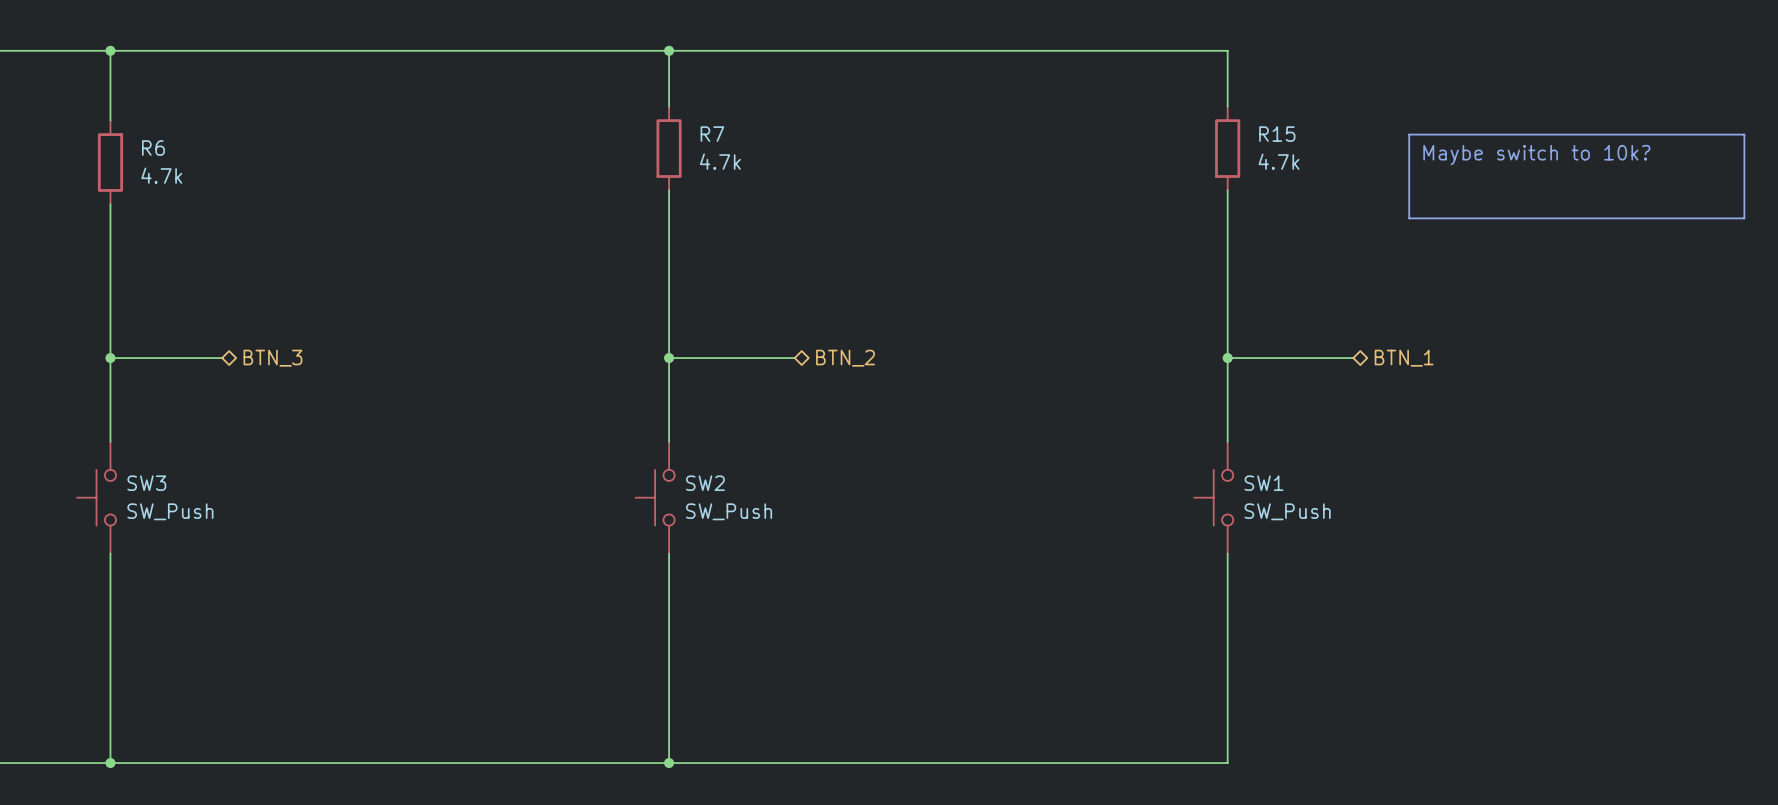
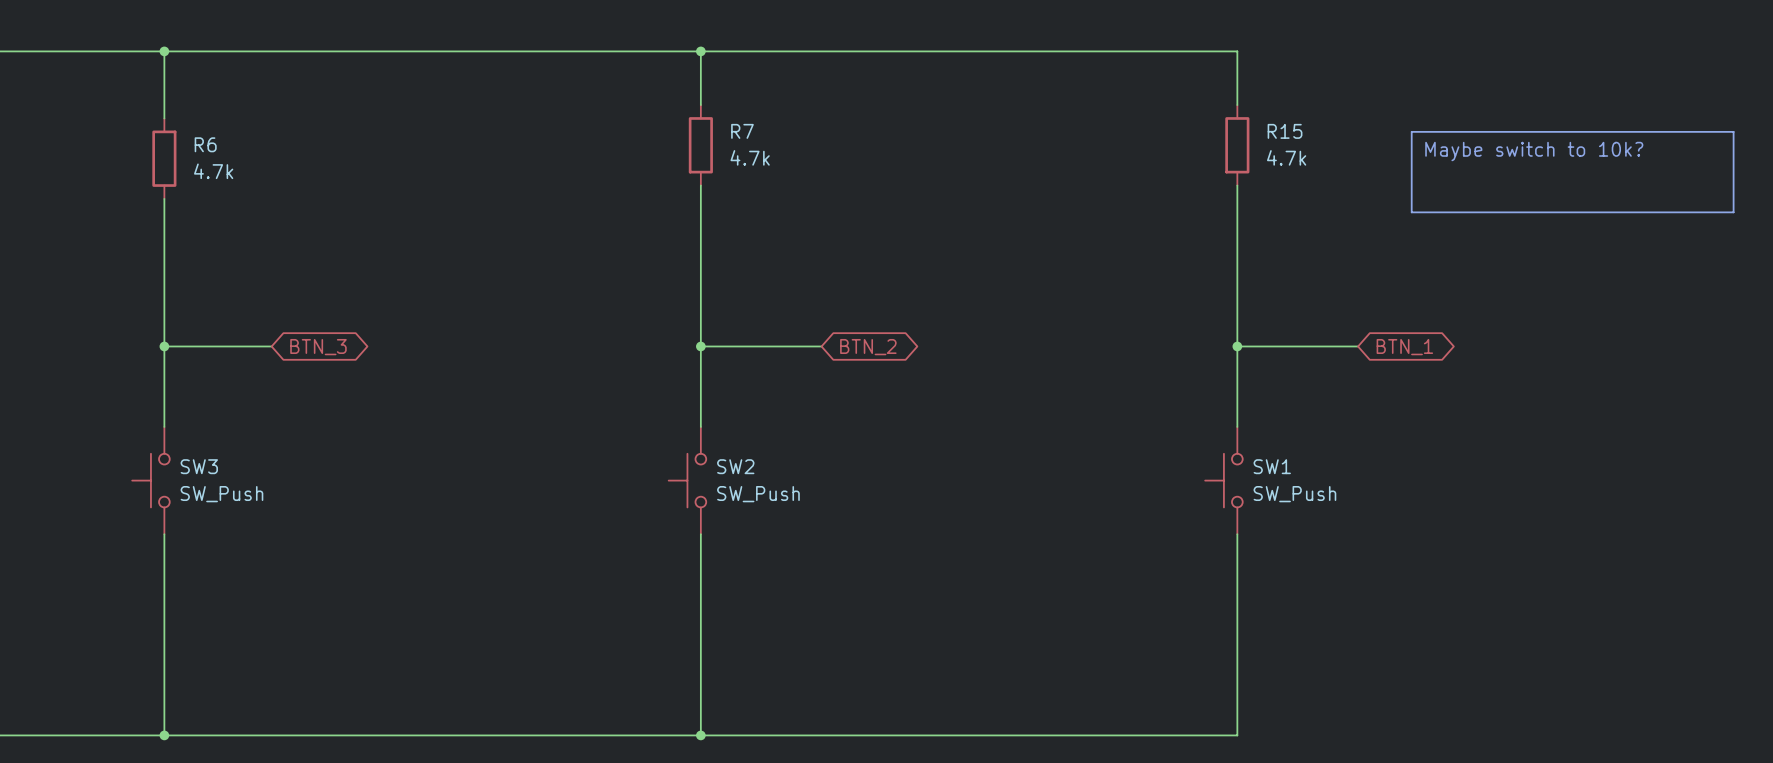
global label: none -> BTN_3 (318, 347)
hierarchical label: BTN_3 (272, 358) -> none
global label: none -> BTN_2 (868, 347)
hierarchical label: BTN_2 (845, 358) -> none
global label: none -> BTN_1 (1404, 347)
hierarchical label: BTN_1 (1404, 358) -> none

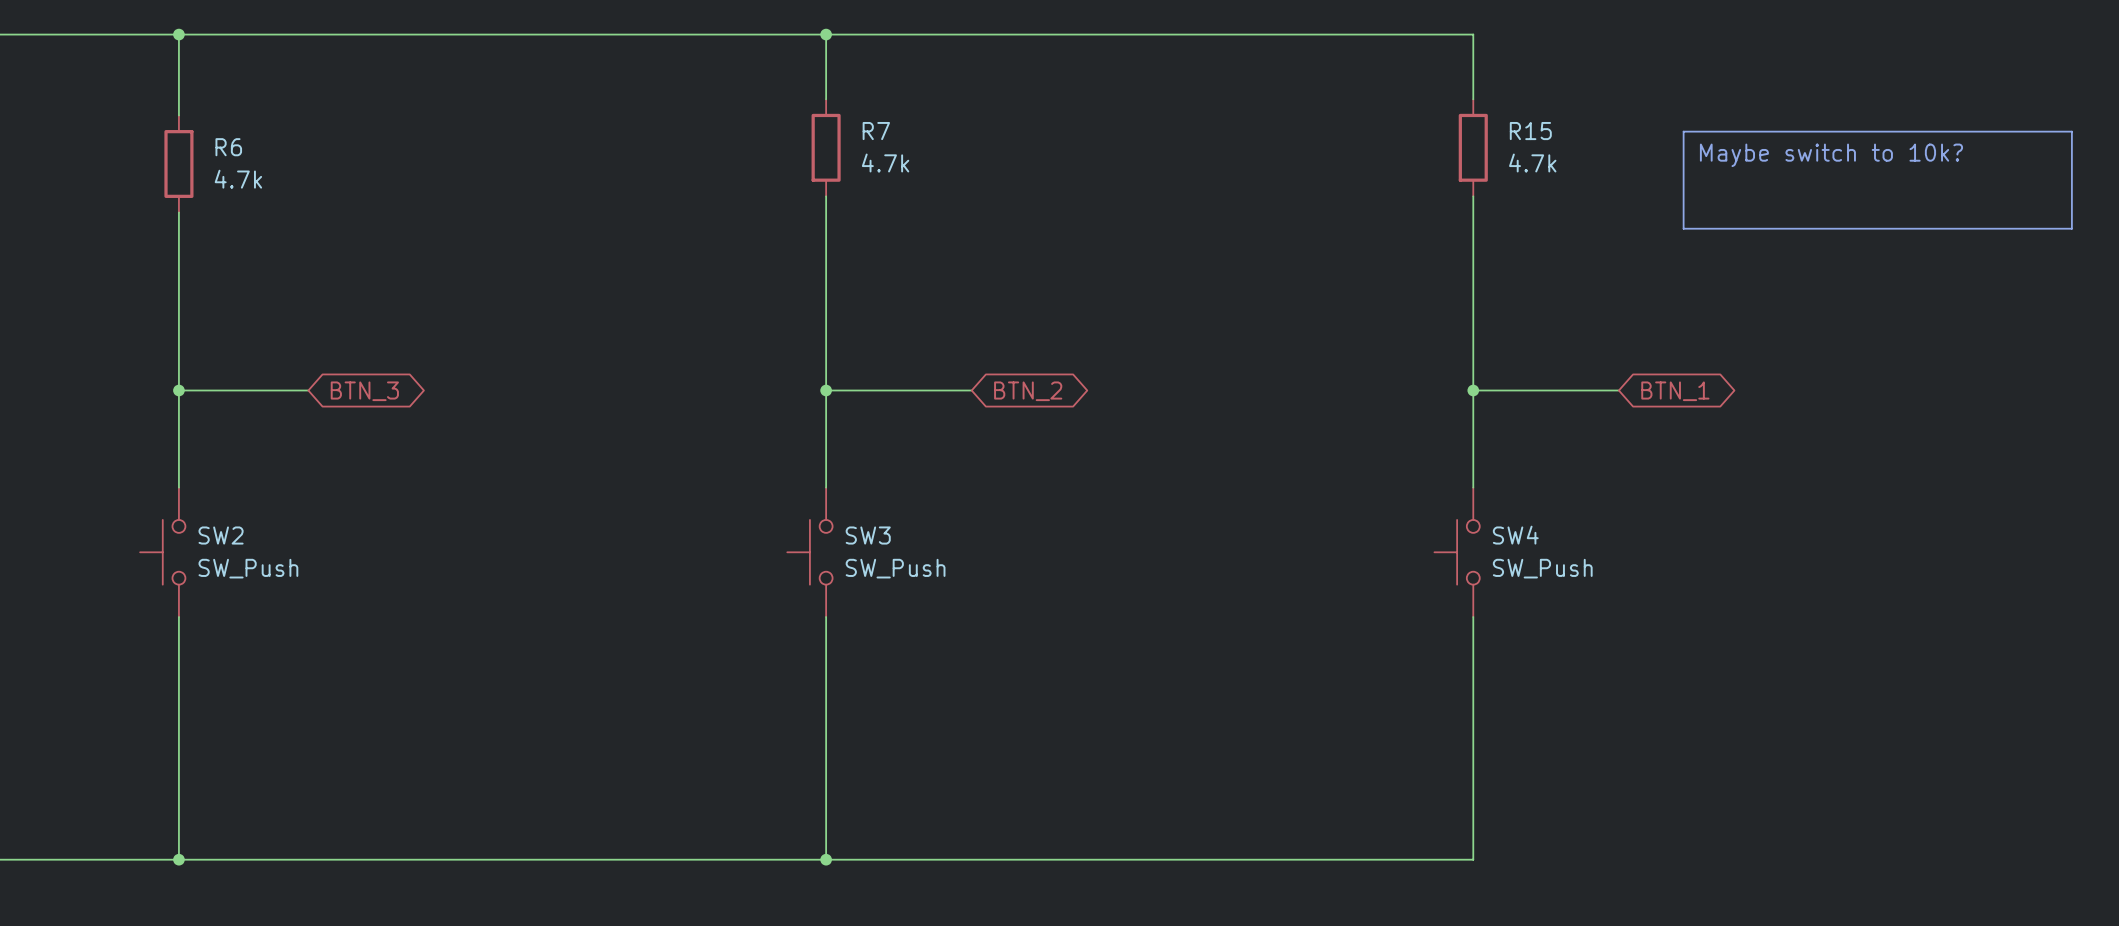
SW3 name: SW3 (199, 466) -> SW2 (221, 535)
SW2 name: SW2 (735, 466) -> SW3 (868, 535)
SW1 name: SW1 (1272, 466) -> SW4 (1515, 535)

